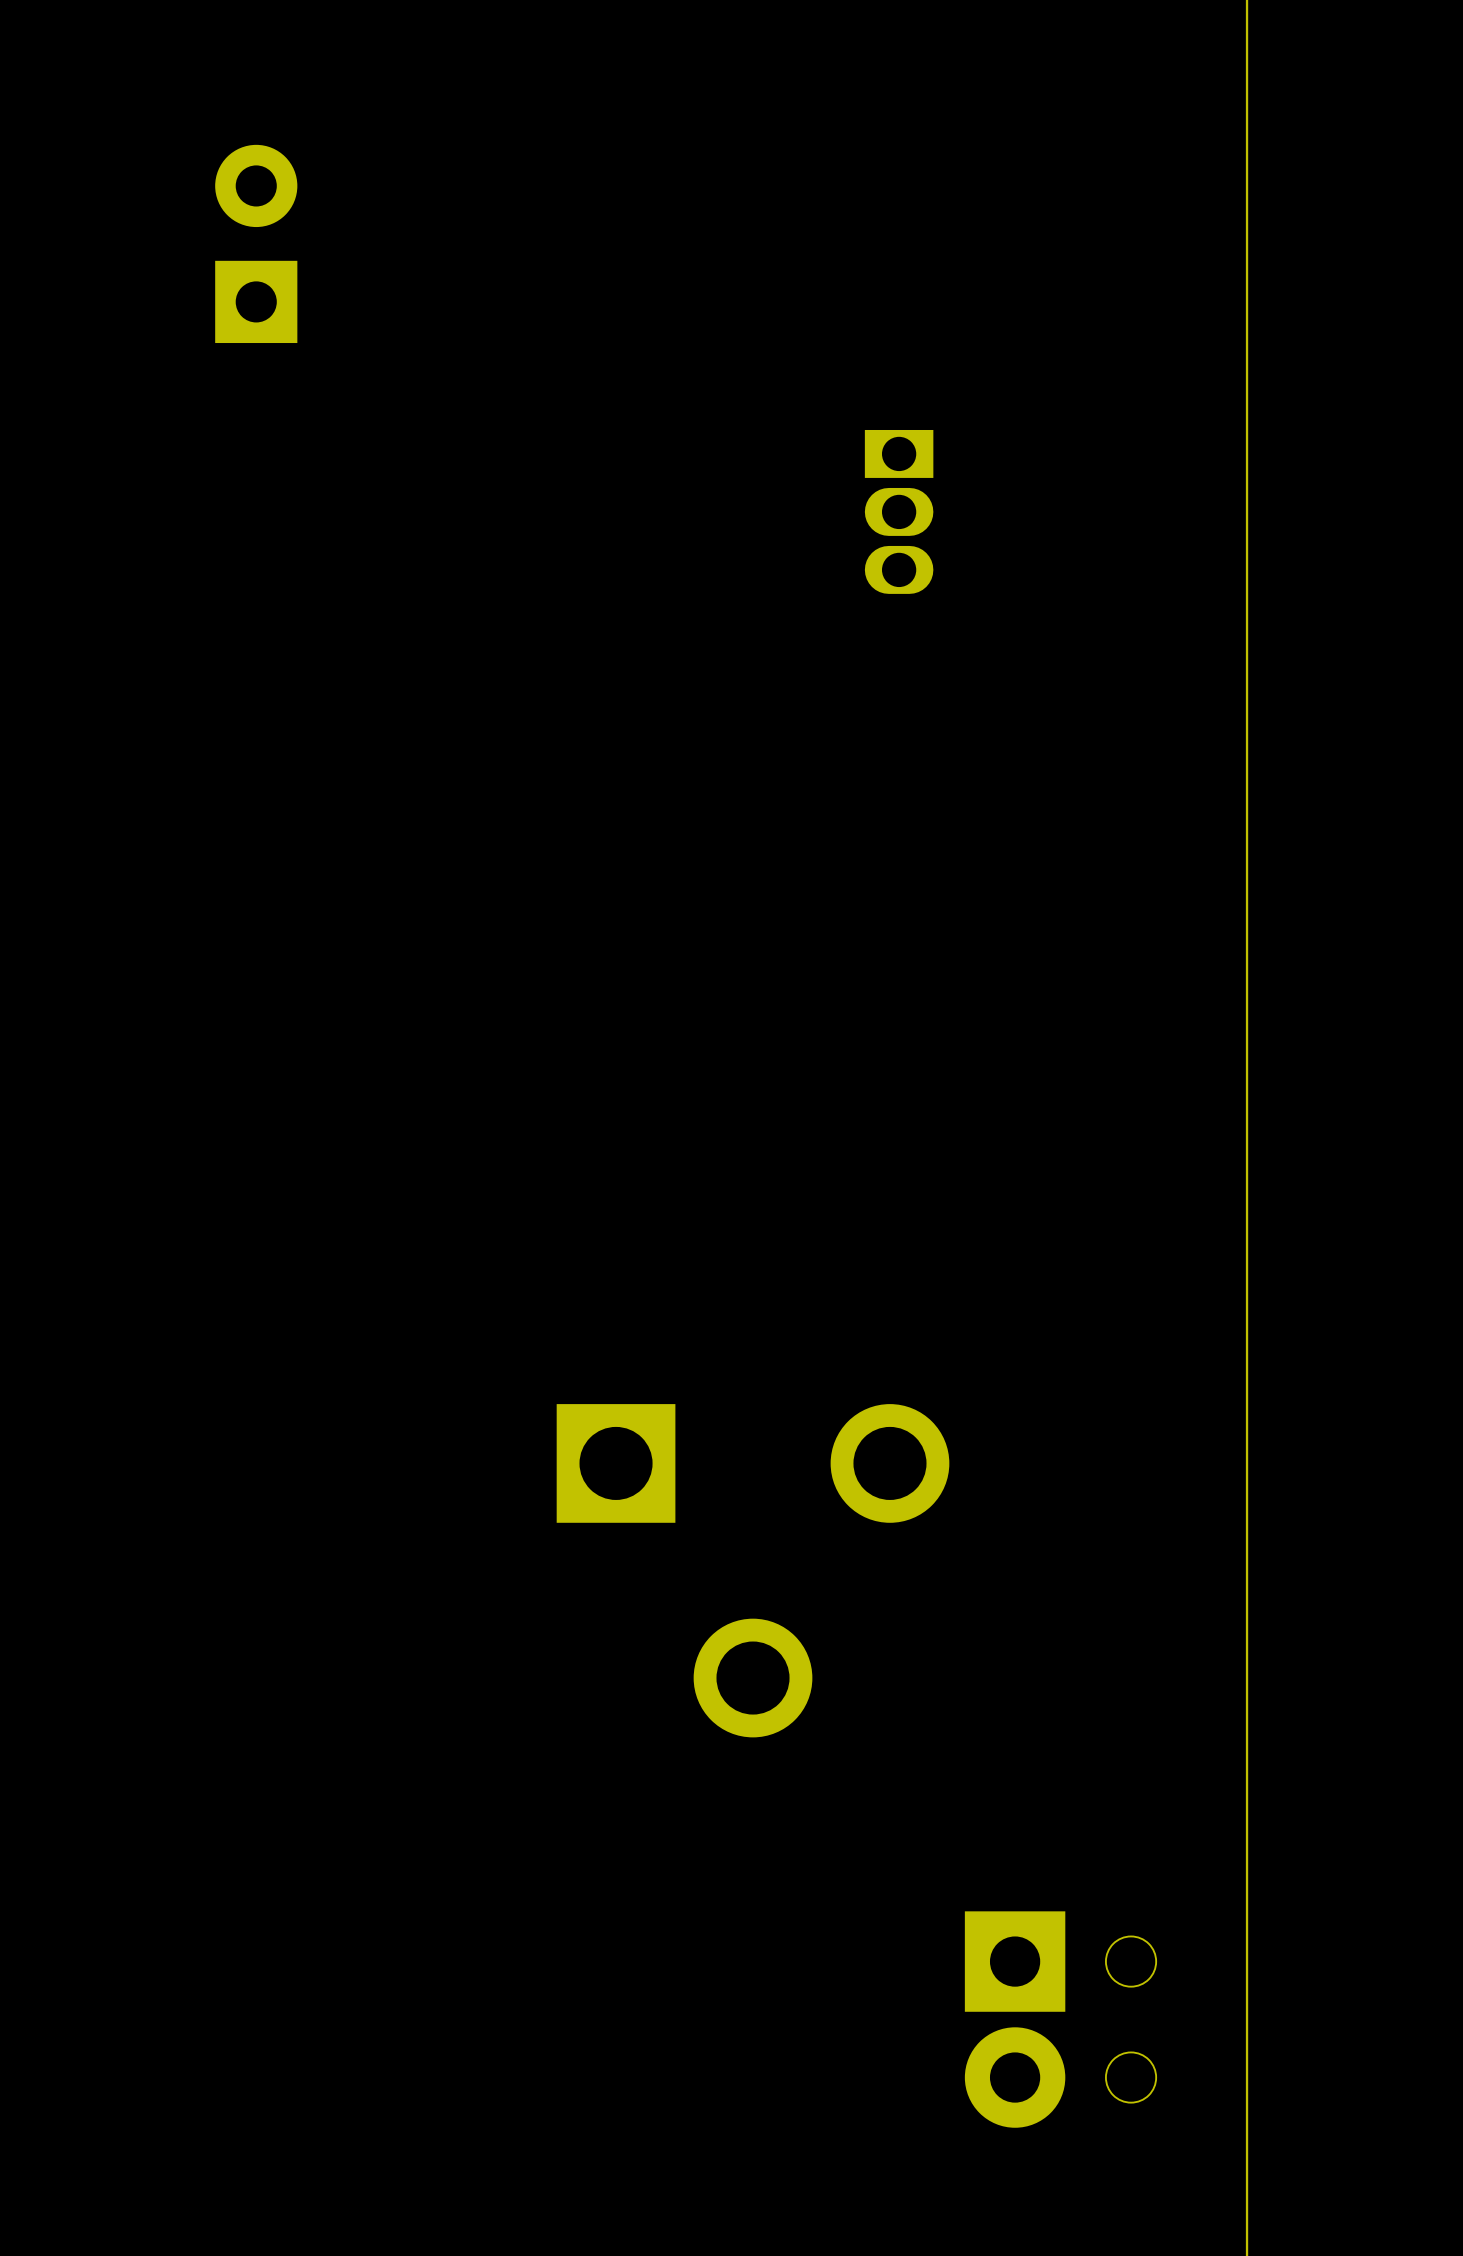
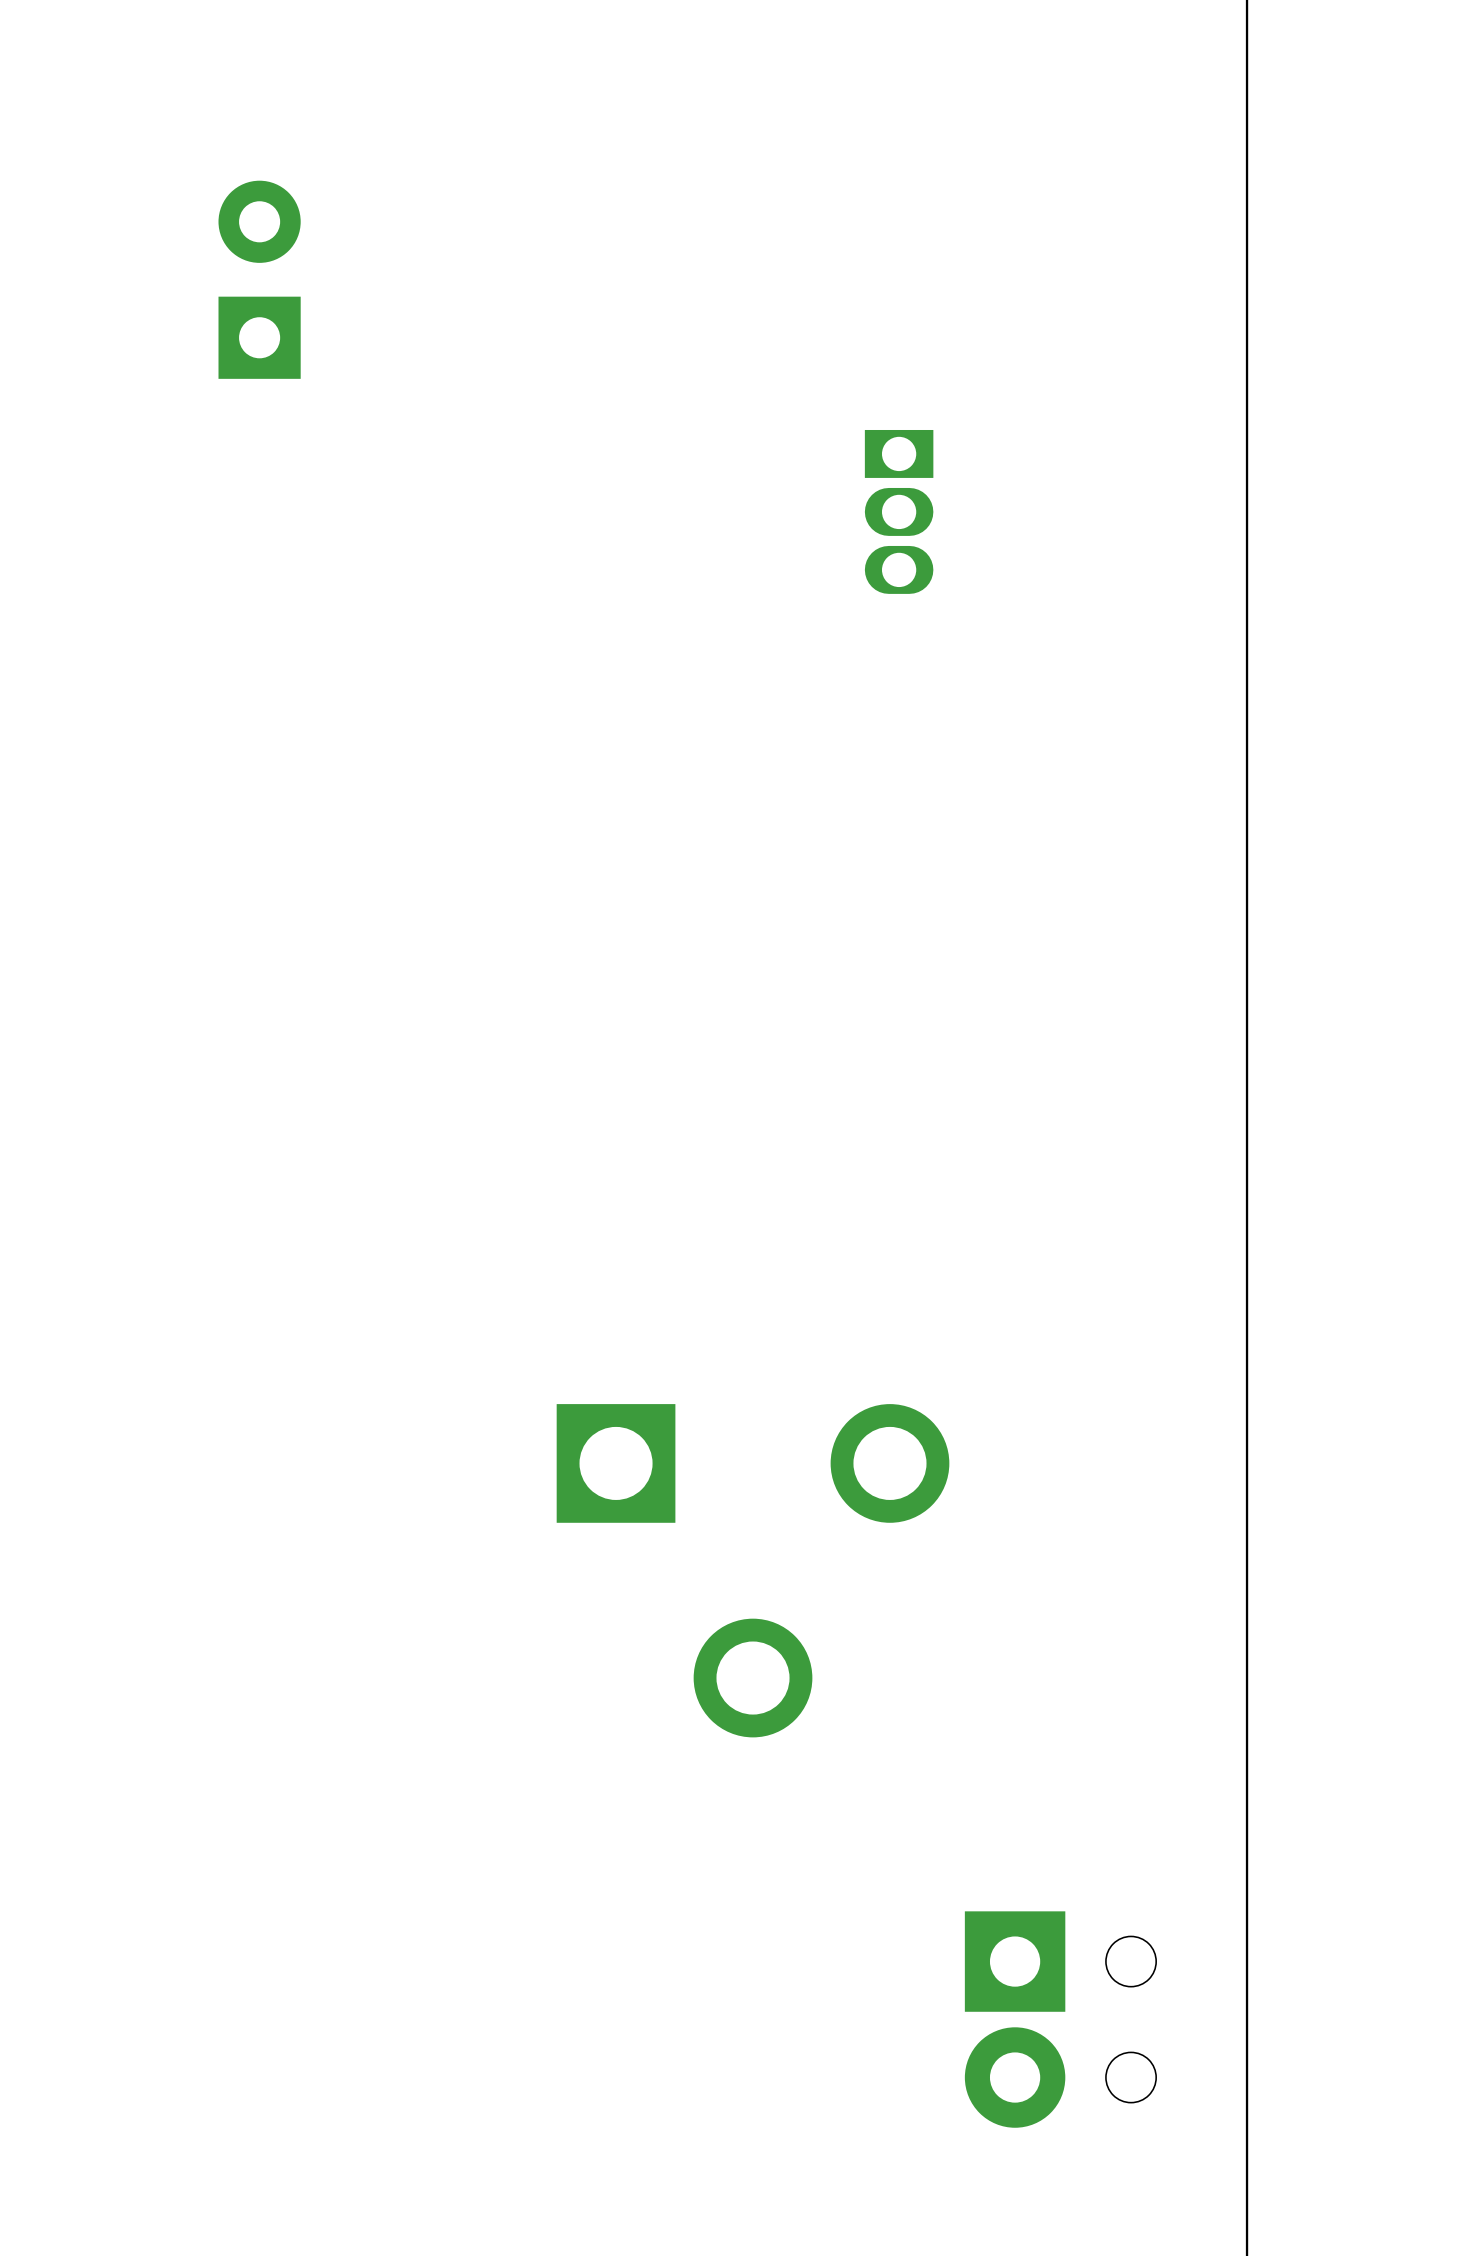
part position: (256, 243) -> (259, 279)

